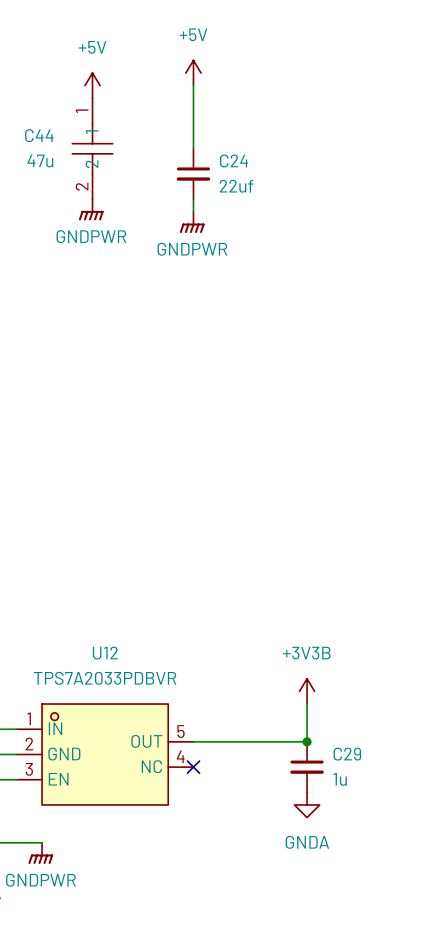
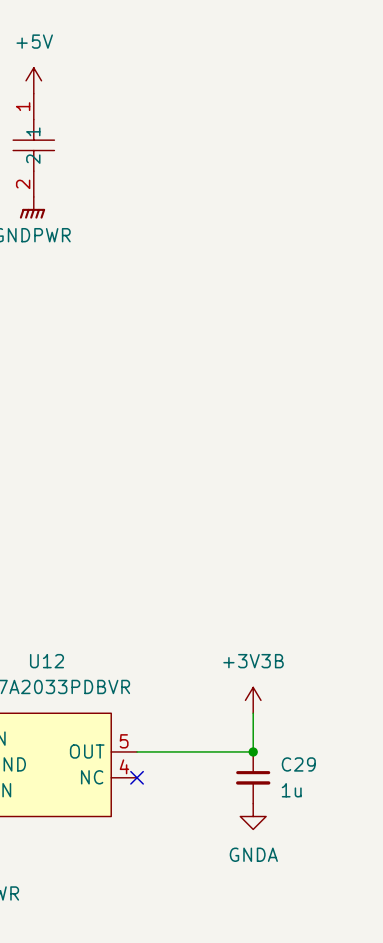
power symbol: +5V (193, 73) -> none
wire: (193, 85) (193, 148) -> none
C24: 22uf (193, 174) -> none
wire: (193, 199) (193, 211) -> none
power symbol: GNDPWR (192, 222) -> none

